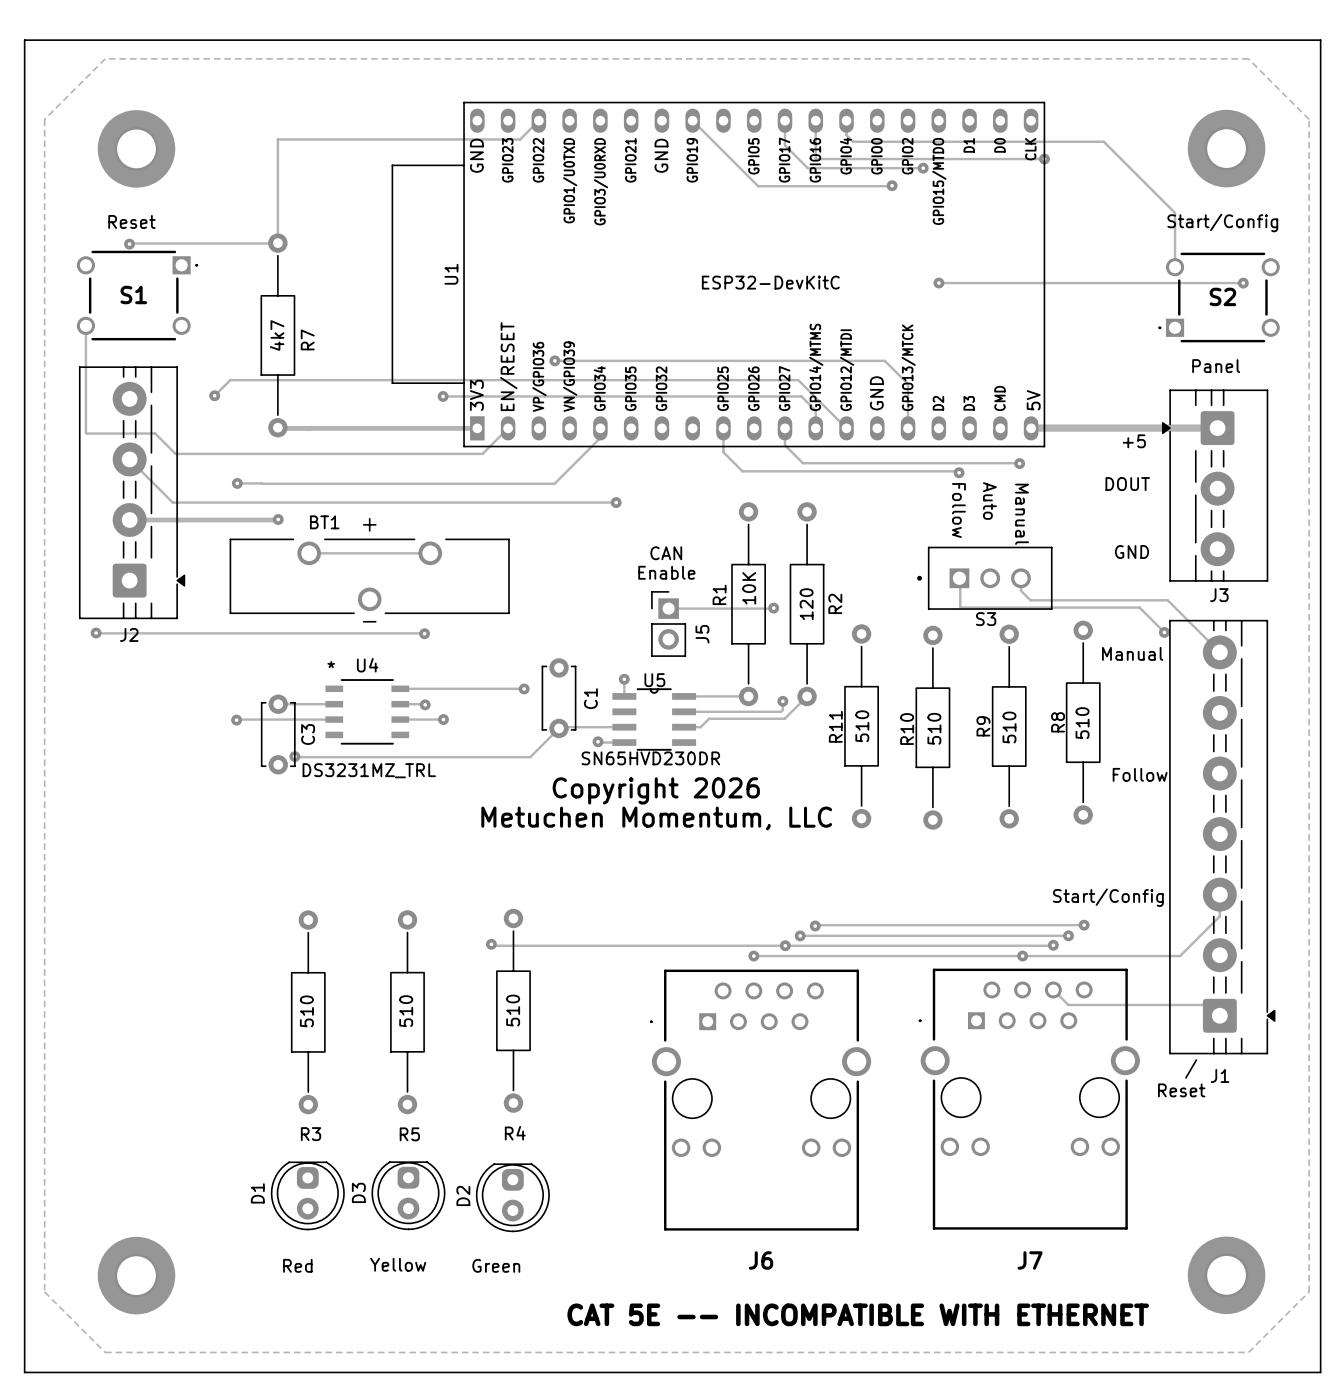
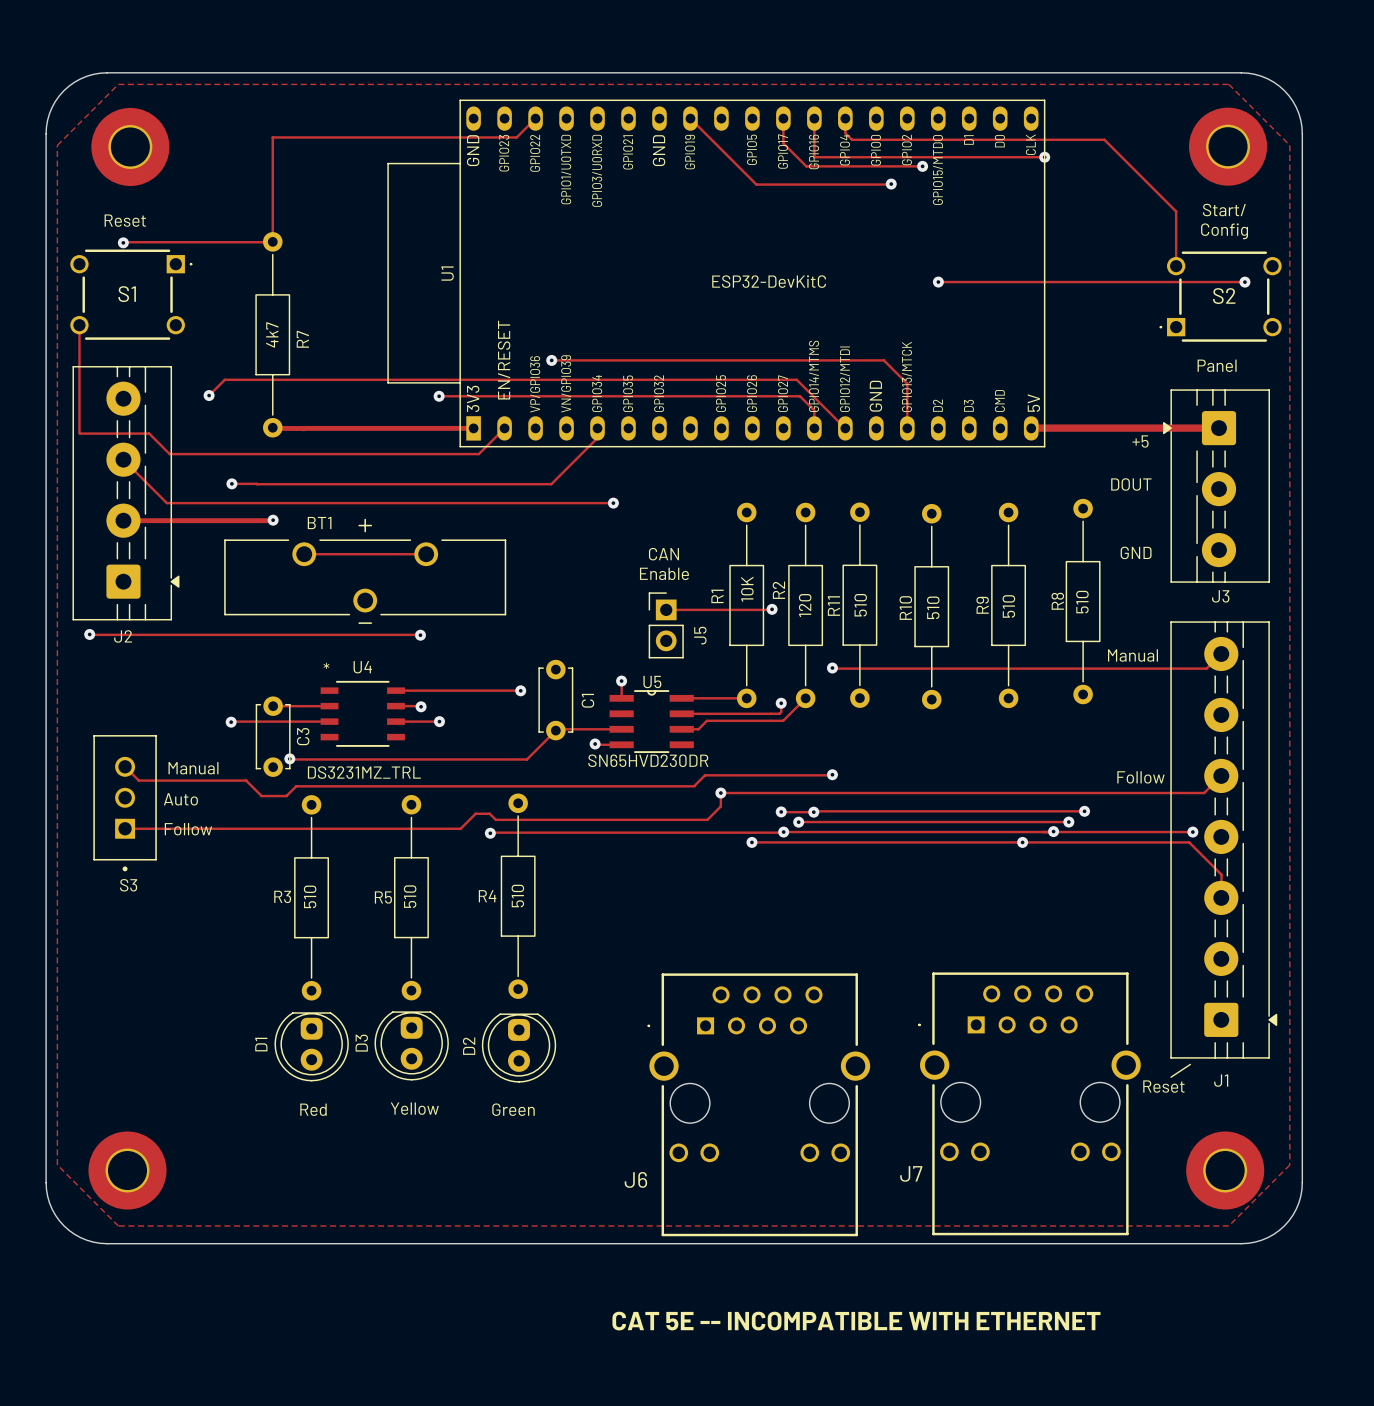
board edge: (24, 40) (1320, 40) (1320, 1372) (24, 1372) (24, 40) -> (107, 72) (93, 74) (80, 78) (63, 90) (55, 101) (49, 113) (46, 133) (46, 1182) (49, 1202) (55, 1215) (63, 1225) (74, 1234) (86, 1240) (107, 1243) (1241, 1243) (1261, 1240) (1273, 1234) (1284, 1225) (1292, 1215) (1298, 1202) (1302, 1182) (1302, 133) (1298, 113) (1292, 101) (1284, 90) (1273, 82) (1261, 76) (1241, 72) (107, 72)
zone outline: (105, 58) (44, 119) (44, 1291) (105, 1352) (1248, 1352) (1309, 1291) (1309, 119) (1248, 58) (105, 58) -> (118, 84) (57, 145) (57, 1165) (118, 1226) (1228, 1226) (1289, 1165) (1289, 145) (1228, 84) (118, 84)
text: none -> Start/ (1224, 210)
text: Start/Config (1222, 222) -> none
text: none -> Config (1224, 231)
track: (723, 428) (723, 452) (742, 471) (959, 472) -> none
track: (784, 428) (784, 445) (802, 463) (1019, 463) -> none
via: (1019, 463) -> none
via: (959, 472) -> none
text: Auto (989, 501) -> none
text: Follow (958, 510) -> none
text: Manual (1022, 514) -> none
S3 rotation: 0° (984, 578) -> 90° counterclockwise (125, 803)
S3 position: (984, 578) -> (125, 803)
track: (1020, 578) (1020, 590) (1030, 600) (1167, 600) (1219, 652) -> (832, 668) (1206, 668) (1221, 653)
track: (960, 579) (960, 607) (1139, 607) (1164, 632) -> none
R2 name position: R2 (835, 603) -> R2 (778, 590)
S3 name position: S3 (986, 619) -> S3 (128, 885)
via: (1164, 632) -> none
via: none -> (832, 668)
R8 position: (1083, 722) -> (1083, 601)
R11 position: (861, 726) -> (859, 605)
R9 position: (1009, 726) -> (1008, 605)
R10 position: (932, 727) -> (931, 606)
track: none -> (125, 766) (138, 780) (246, 780)
text: none -> Manual (193, 768)
track: none -> (826, 775) (705, 775) (694, 785)
via: none -> (832, 774)
track: none -> (1221, 775) (1204, 793) (720, 793) (720, 806) (707, 819) (495, 819) (489, 813) (475, 813) (460, 828) (125, 828)
track: none -> (246, 780) (261, 796) (286, 796)
track: none -> (694, 786) (296, 786) (286, 795)
text: Copyright 2026 (656, 790) -> none
via: none -> (720, 793)
text: none -> Auto (180, 799)
via: none -> (1084, 811)
track: none -> (781, 811) (813, 812)
via: none -> (781, 811)
via: none -> (813, 812)
text: Metuchen Momentum, LLC (656, 818) -> none
via: none -> (798, 822)
via: none -> (1068, 822)
text: none -> Follow (188, 829)
via: none -> (1053, 831)
via: none -> (783, 832)
track: none -> (1192, 832) (490, 833)
via: none -> (1192, 832)
via: none -> (490, 833)
via: none -> (751, 842)
via: none -> (1022, 842)
track: (1219, 894) (1219, 916) (1180, 956) (753, 956) -> (1221, 897) (1221, 874) (1189, 842) (751, 842)
text: Start/Config (1108, 897) -> none
track: (1084, 925) (815, 926) -> (1084, 811) (813, 812)
via: (1084, 925) -> none
via: (815, 926) -> none
track: (800, 935) (1068, 935) -> (798, 822) (1068, 822)
via: (800, 935) -> none
via: (1068, 935) -> none
track: (491, 944) (1053, 945) -> none
via: (491, 944) -> none
via: (785, 945) -> none
via: (1053, 945) -> none
via: (753, 956) -> none
via: (1022, 956) -> none
track: (1053, 989) (1068, 1004) (1209, 1004) -> none
R4 position: (513, 1010) -> (518, 896)
R3 position: (308, 1012) -> (311, 897)
R5 position: (407, 1012) -> (411, 897)
line: none -> (1190, 1064) (1171, 1077)
line: (1196, 1059) (1185, 1077) -> none
text position: Reset (1181, 1090) -> Reset (1163, 1086)
R4 name position: R4 (515, 1133) -> R4 (487, 896)
R3 name position: R3 (311, 1134) -> R3 (282, 896)
R5 name position: R5 (409, 1134) -> R5 (383, 897)
D1 position: (307, 1195) -> (311, 1046)
D3 position: (408, 1195) -> (411, 1045)
D2 position: (512, 1197) -> (519, 1048)
J6 name position: J6 (761, 1260) -> J6 (635, 1179)
J7 name position: J7 (1030, 1260) -> J7 (911, 1173)
text position: Yellow (398, 1264) -> Yellow (414, 1108)
text position: Red (297, 1265) -> Red (313, 1109)
text position: Green (496, 1265) -> Green (513, 1109)
part position: (136, 1275) -> (127, 1170)
part position: (1226, 1275) -> (1225, 1170)

